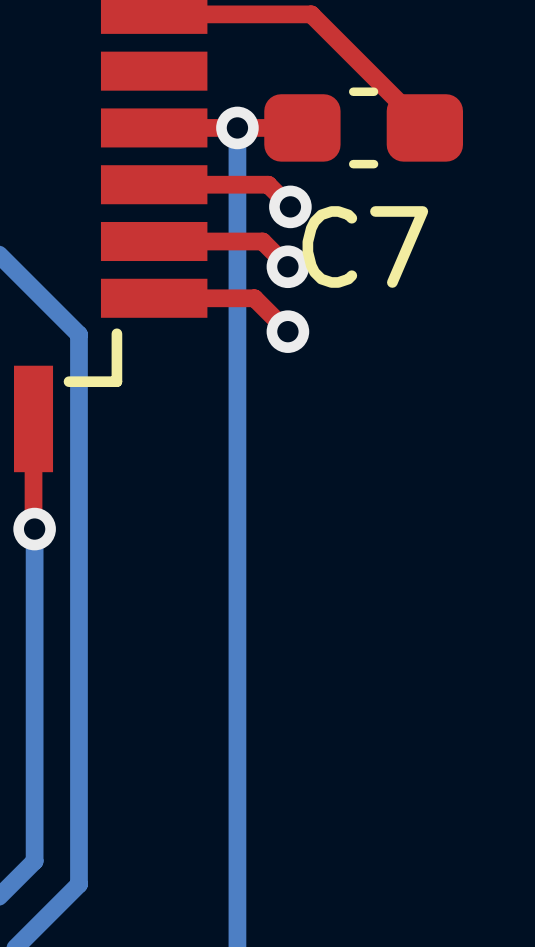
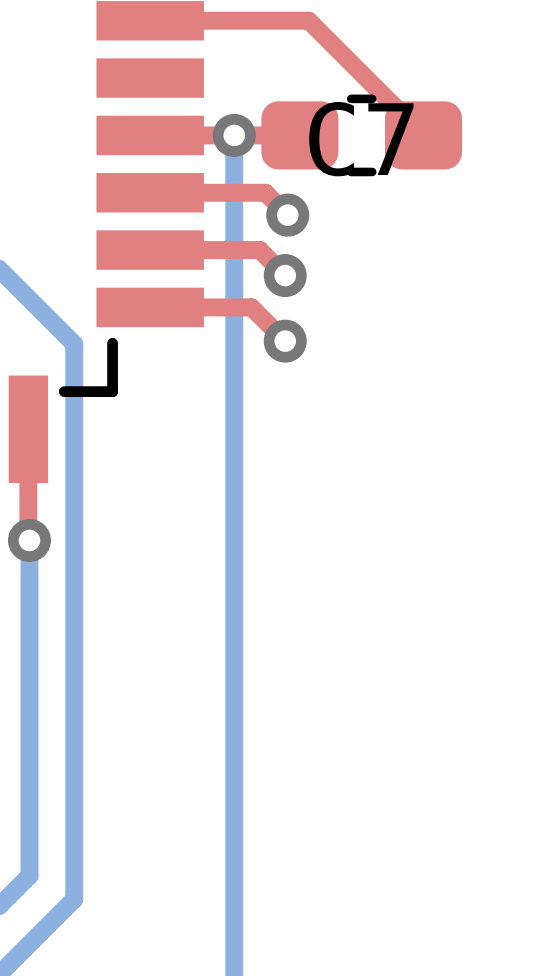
C7 name position: C7 (365, 246) -> C7 (361, 139)

